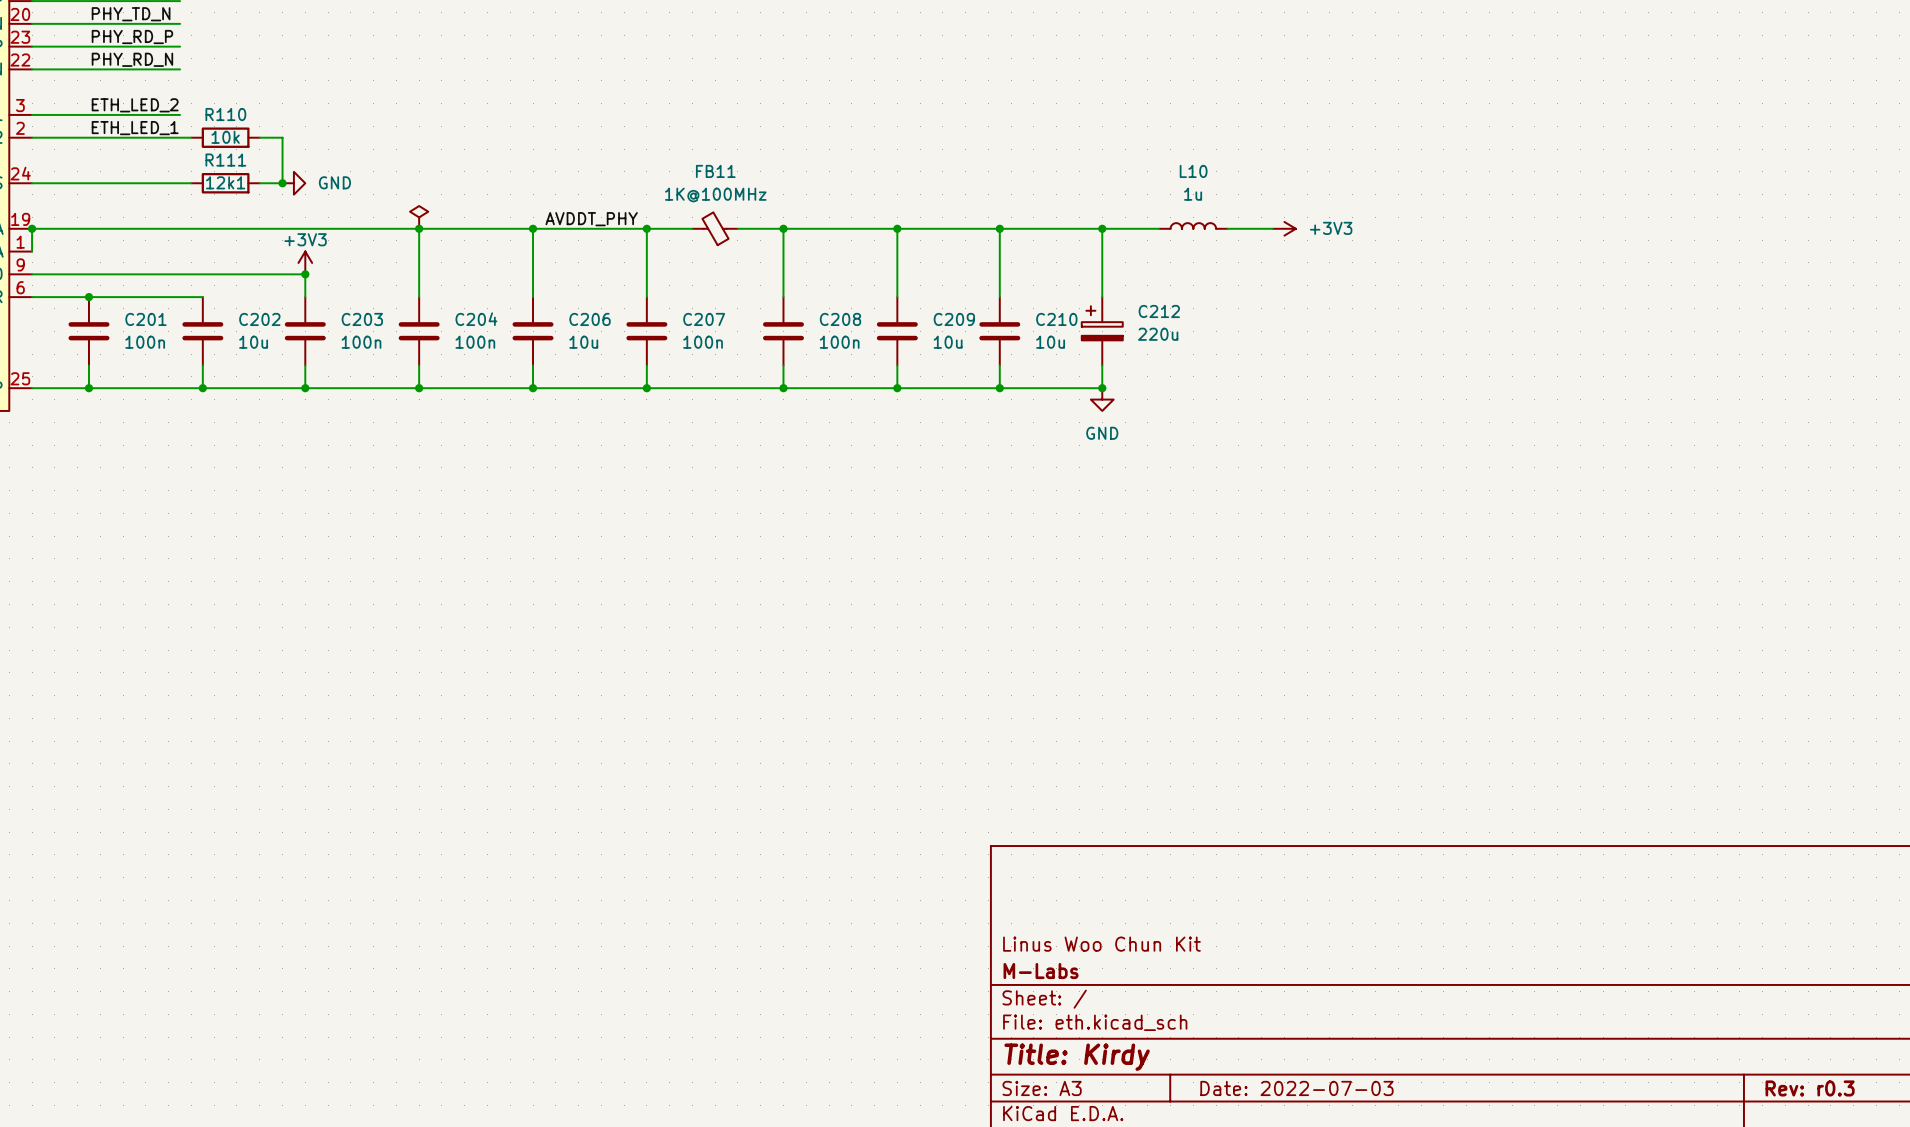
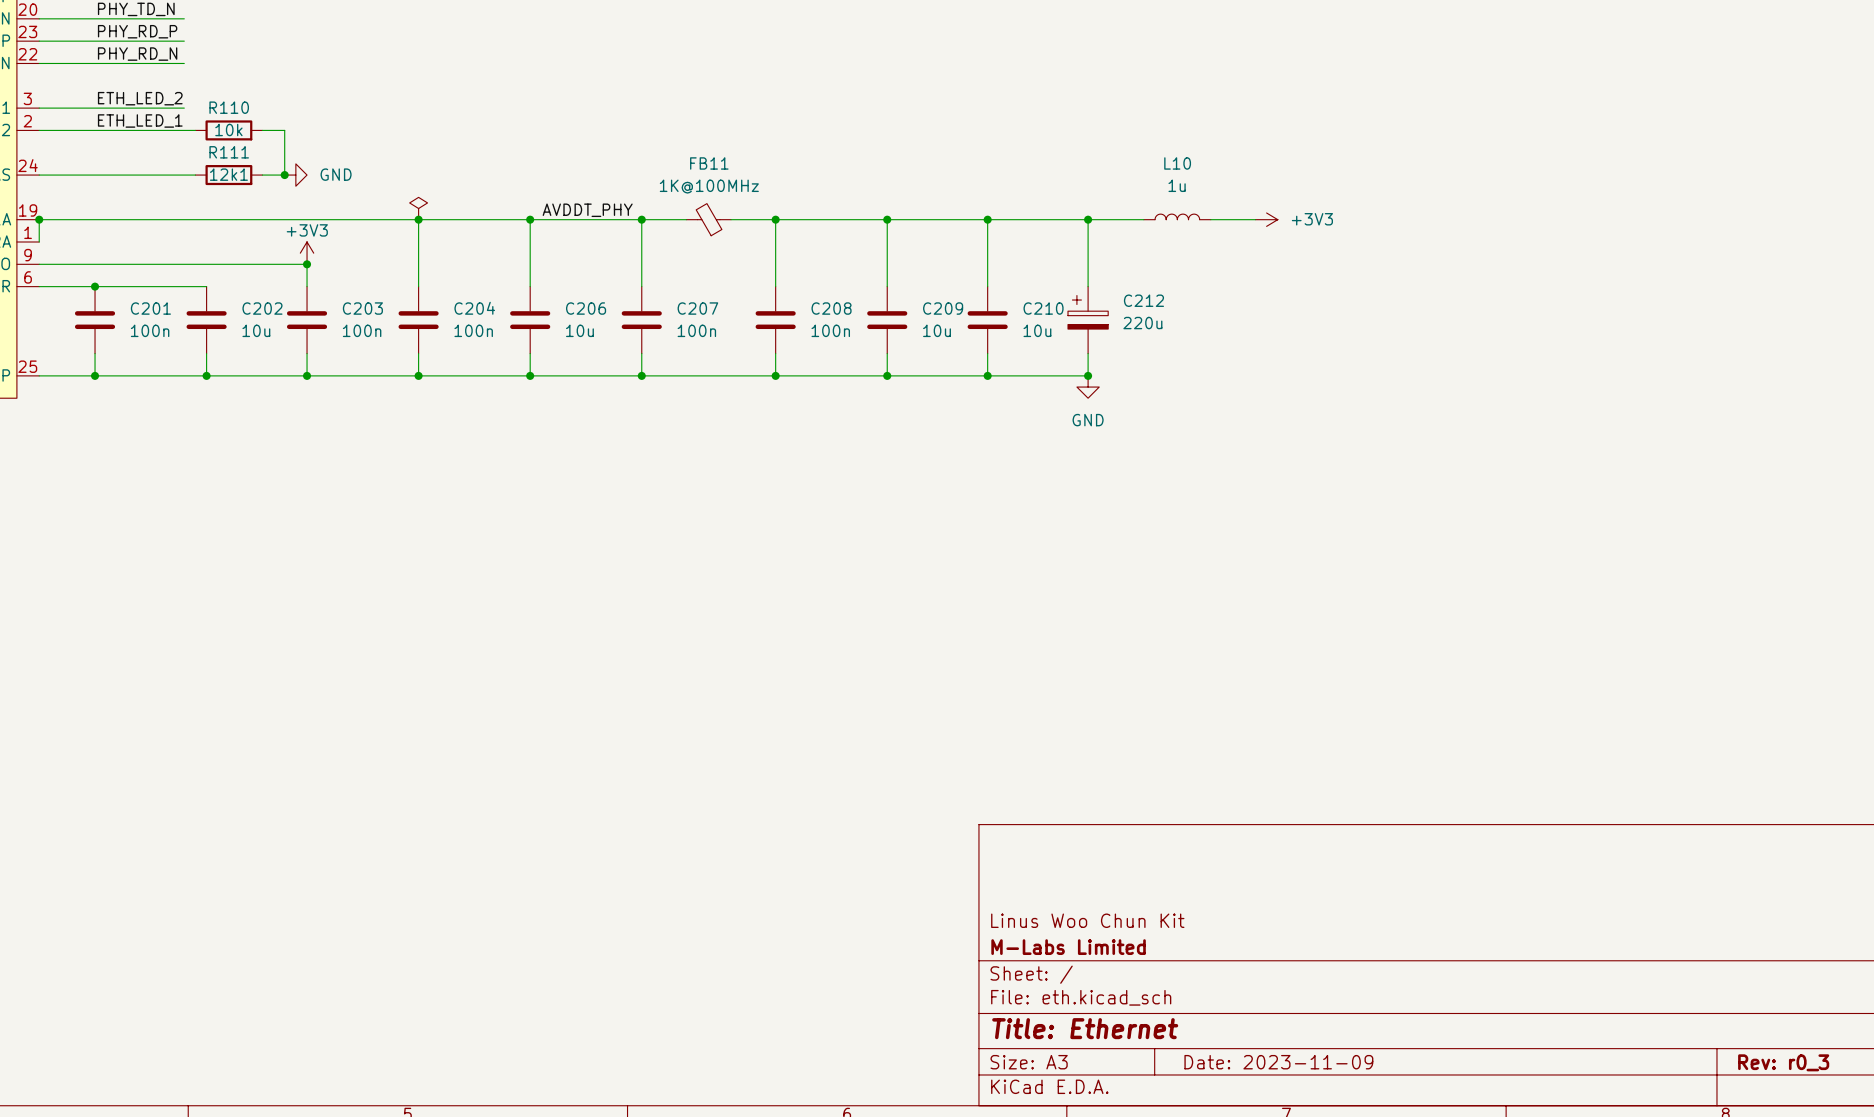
title block: M-Labs (1041, 971) -> M-Labs Limited (1068, 947)
title block: Title: Kirdy (1077, 1057) -> Title: Ethernet (1085, 1028)
title block: Date: 2022-07-03 (1296, 1088) -> Date: 2023-11-09 (1278, 1062)
title block: Rev: r0.3 (1810, 1088) -> Rev: r0_3 (1783, 1062)

